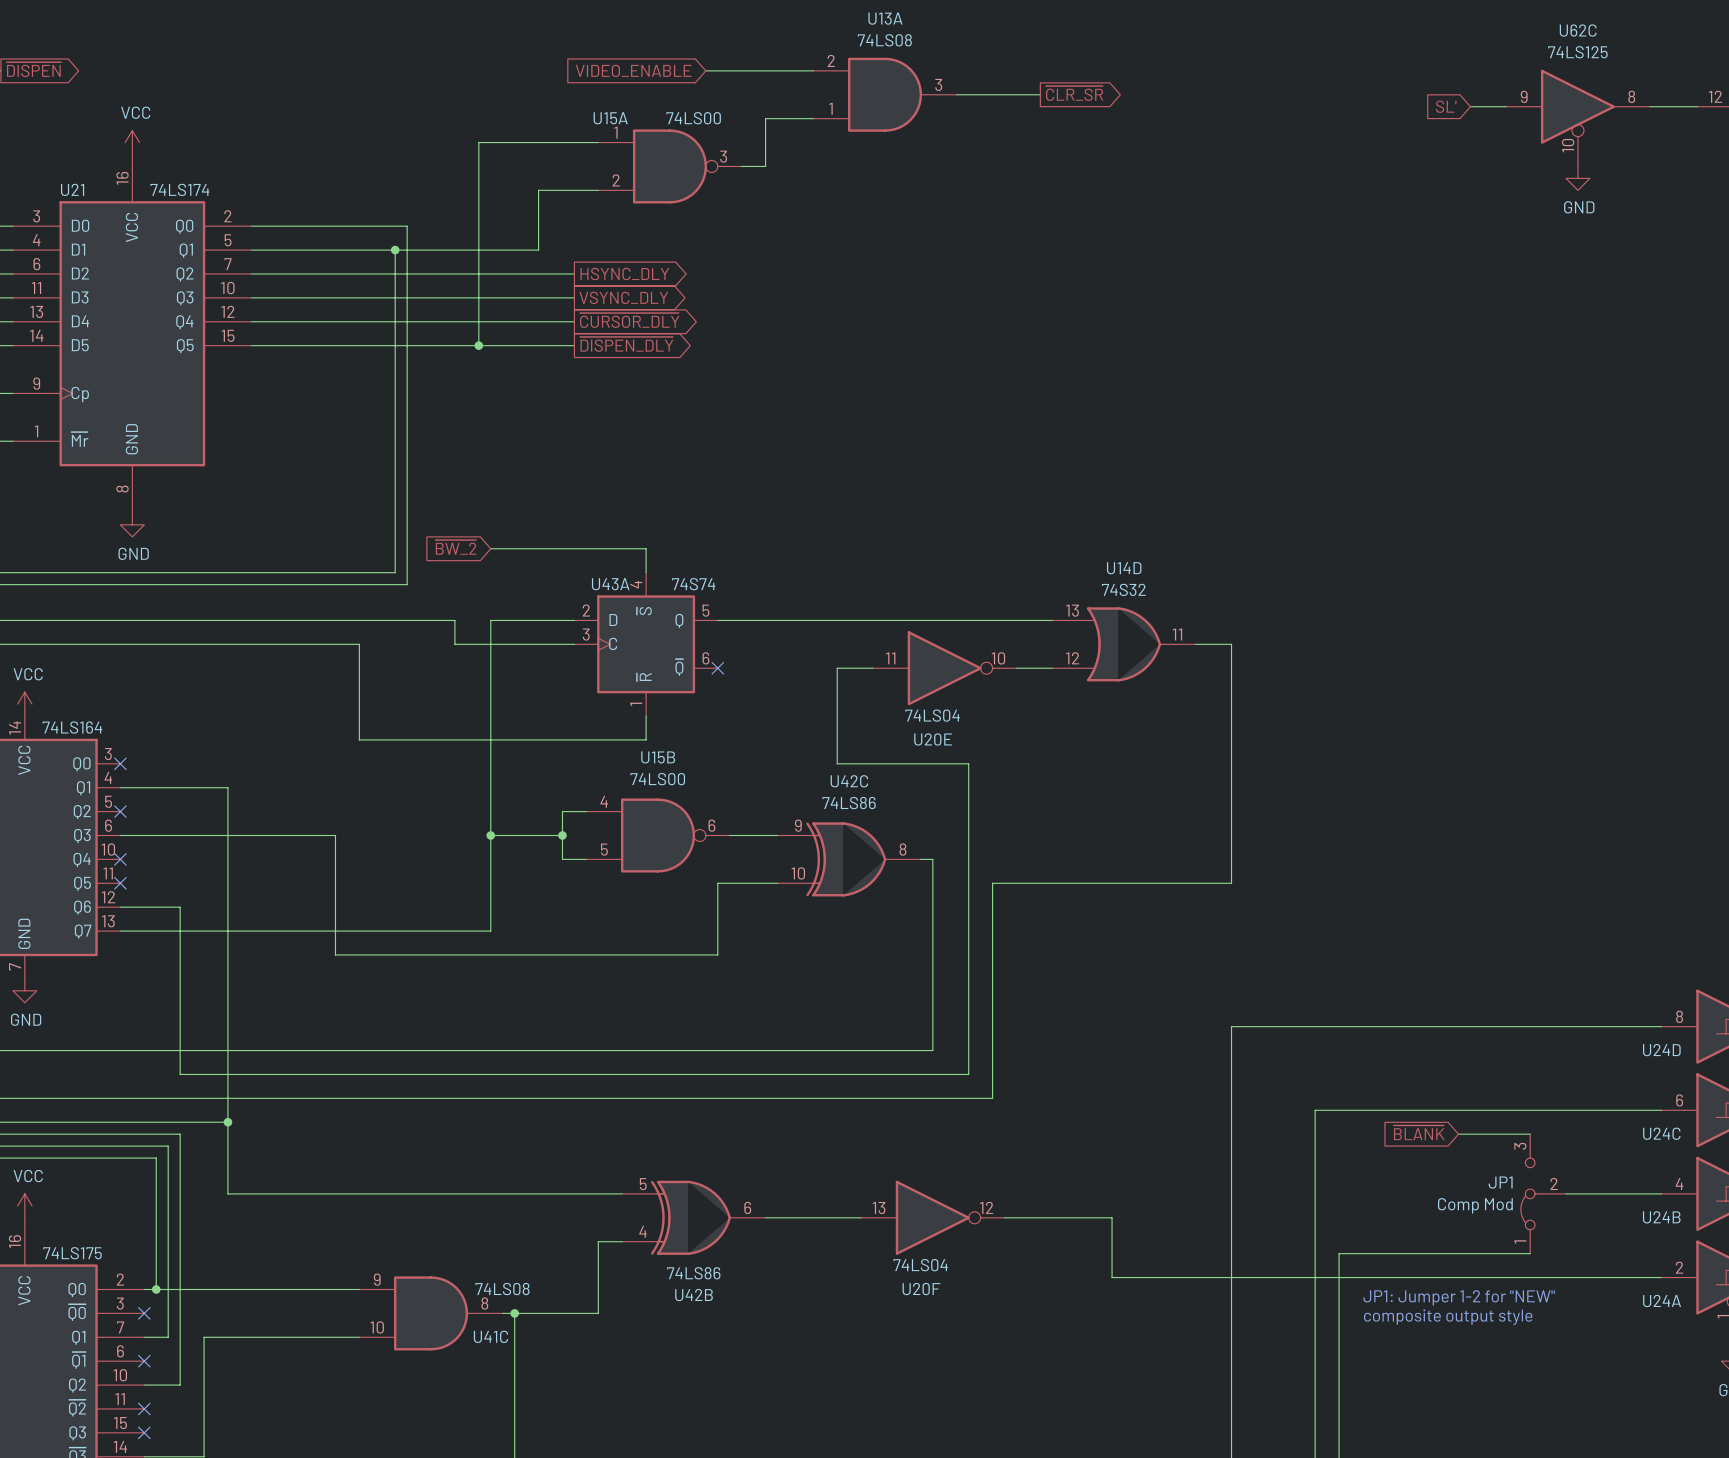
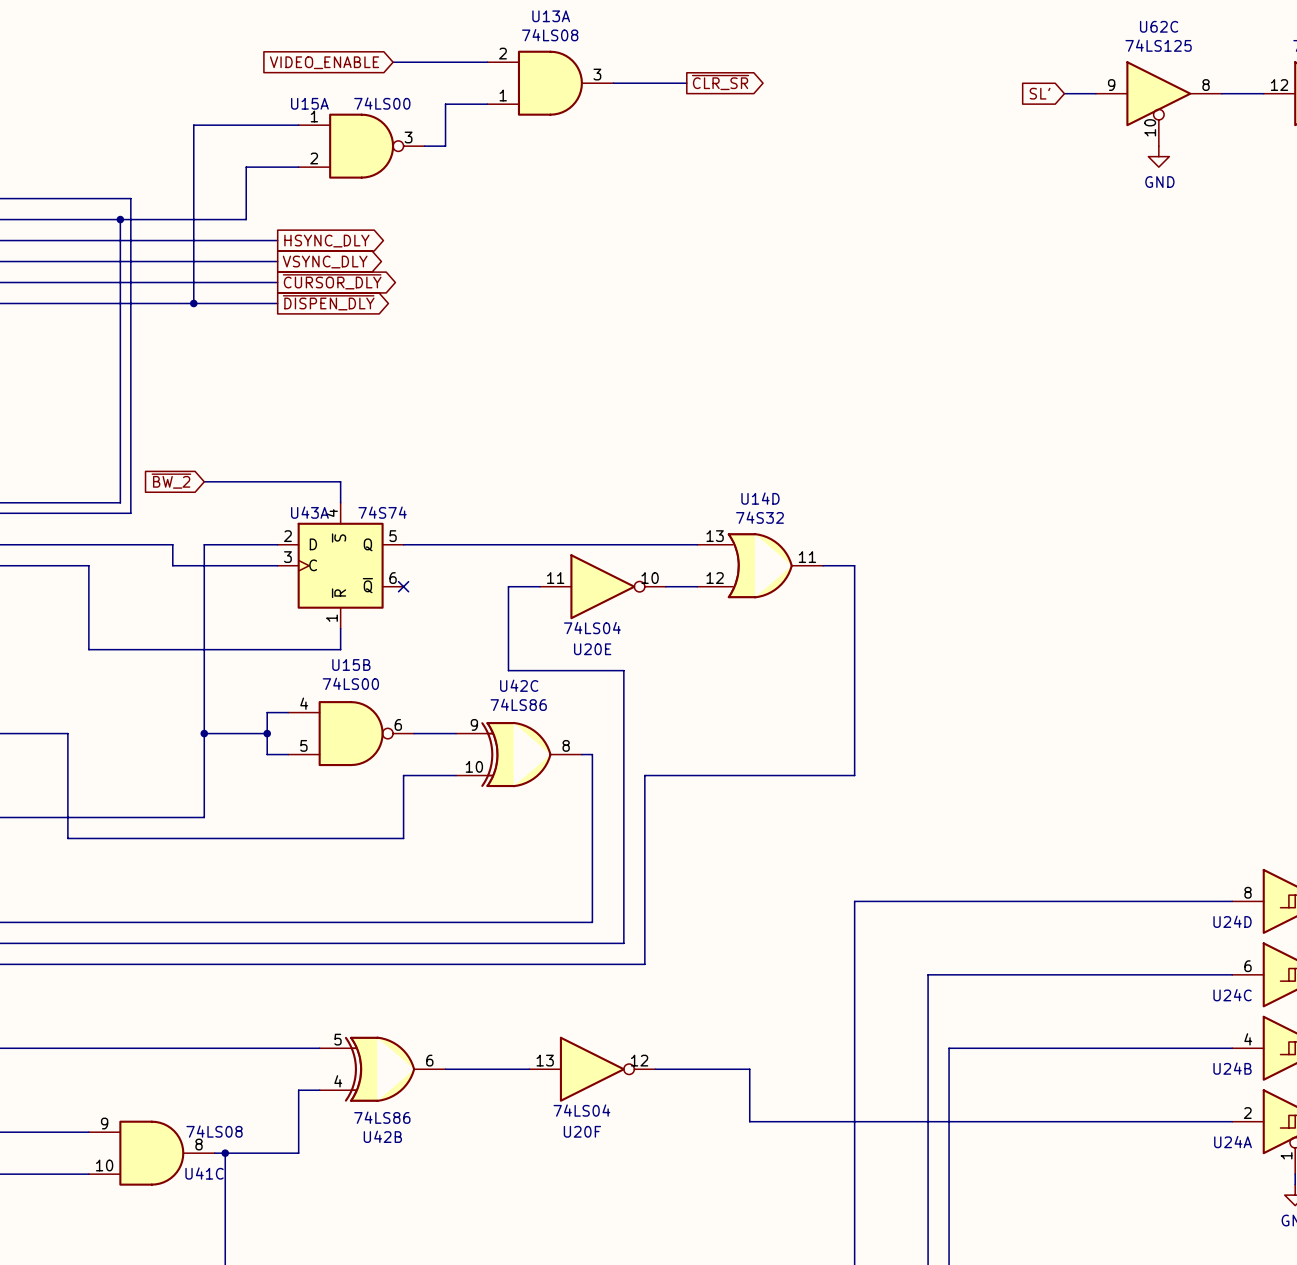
global label: ~{BLANK} (1419, 1132) -> none
wire: (1458, 1134) (1530, 1134) -> none
JP1: Comp Mod (1543, 1193) -> none
wire: (1339, 1253) (1530, 1253) -> (949, 1100) (949, 1048) (1148, 1048)
text: JP1: Jumper 1-2 for "NEW" (1459, 1297) -> none
text: composite output style (1448, 1317) -> none

